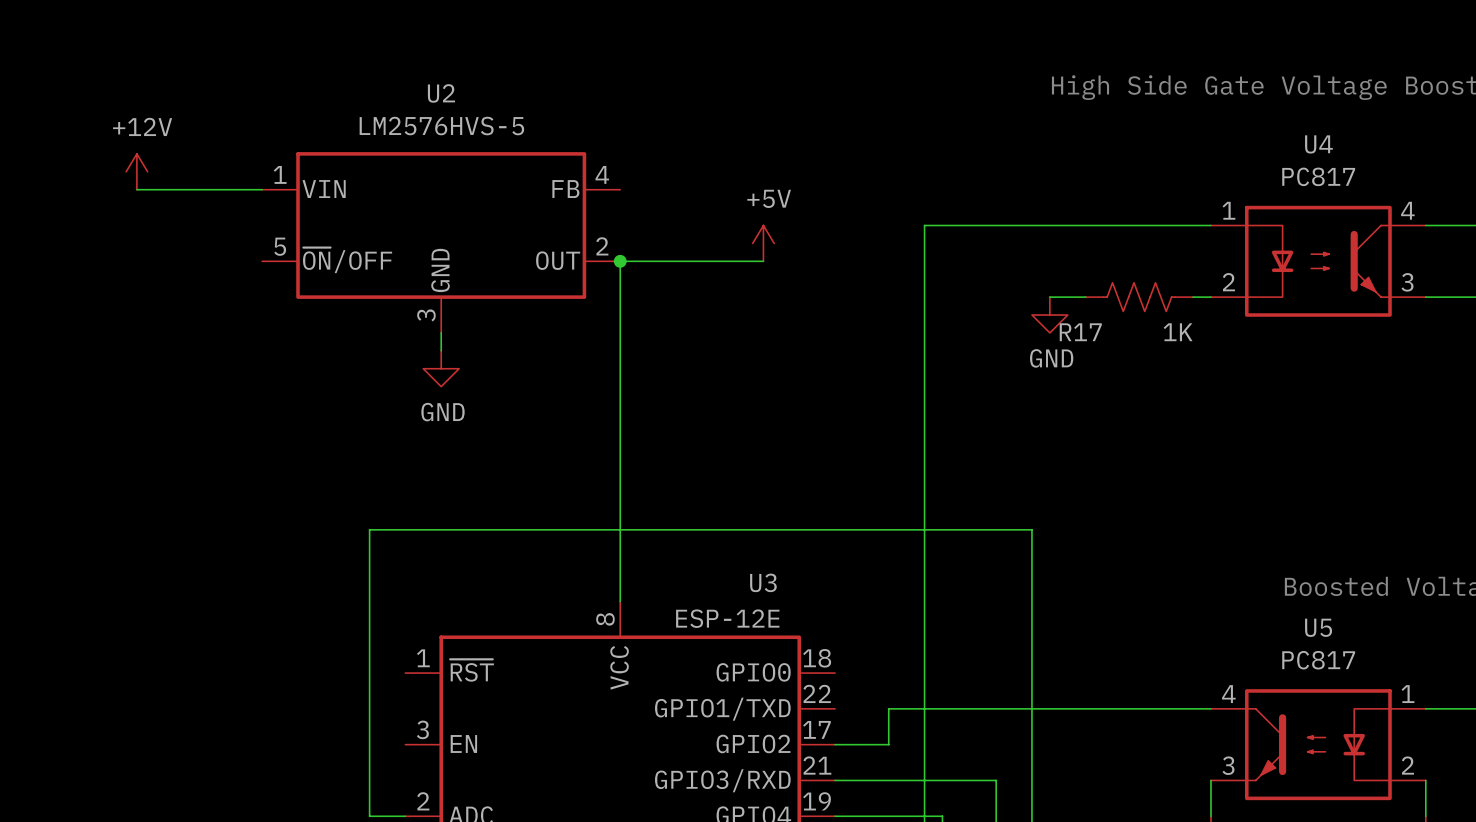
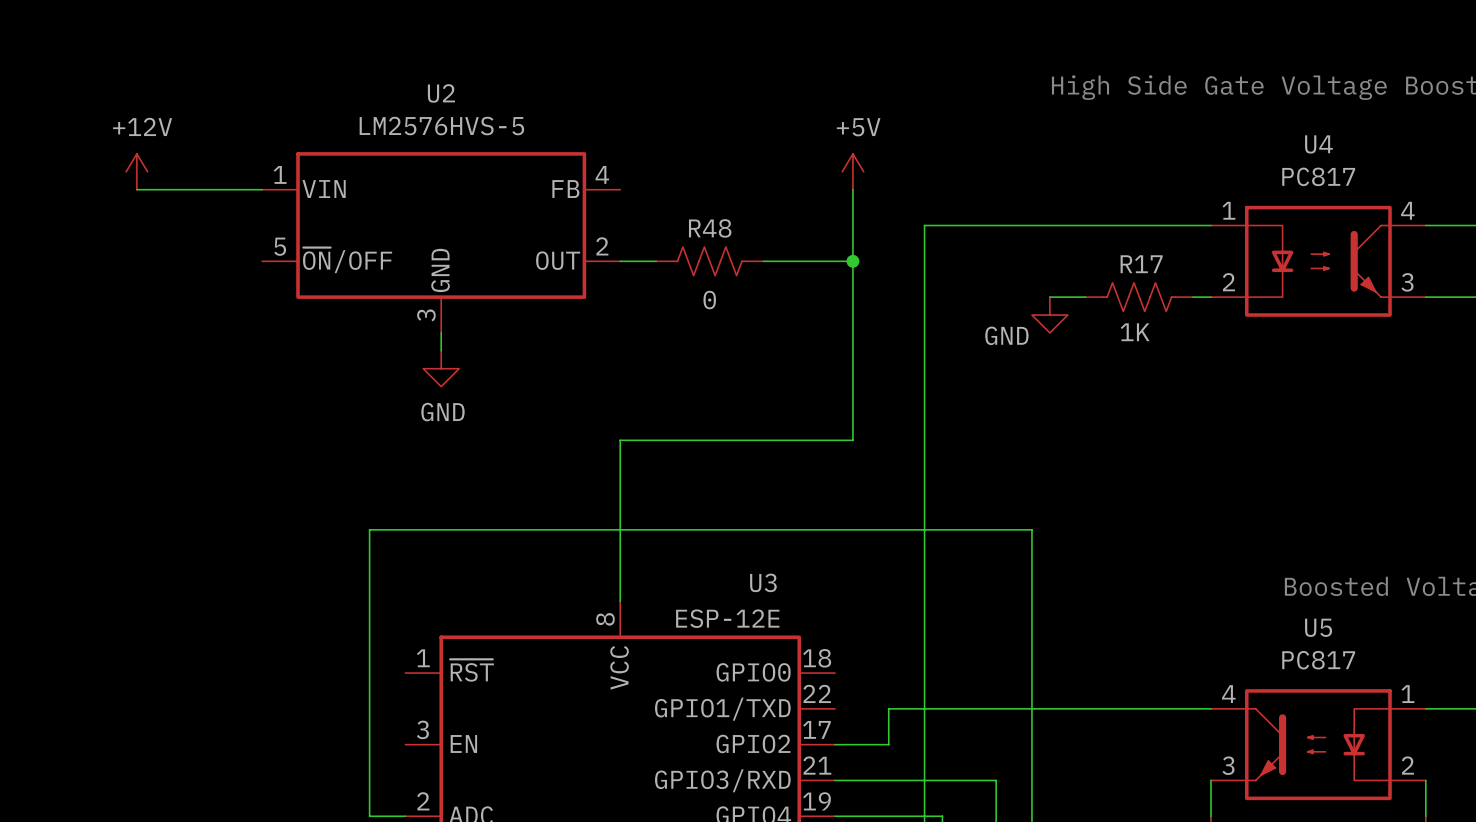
power symbol position: +5V (763, 243) -> +5V (852, 171)
wire: (620, 261) (620, 440) -> (852, 189) (852, 440) (620, 440)
junction: (620, 261) -> none
wire: (656, 261) (763, 261) -> (852, 261) (763, 261)
R48: none -> 0 (709, 261)
junction: none -> (852, 261)
R17 name position: R17 (1080, 332) -> R17 (1141, 264)
R17 value position: 1K (1178, 332) -> 1K (1135, 332)
power symbol text position: GND (1051, 358) -> GND (1006, 335)

